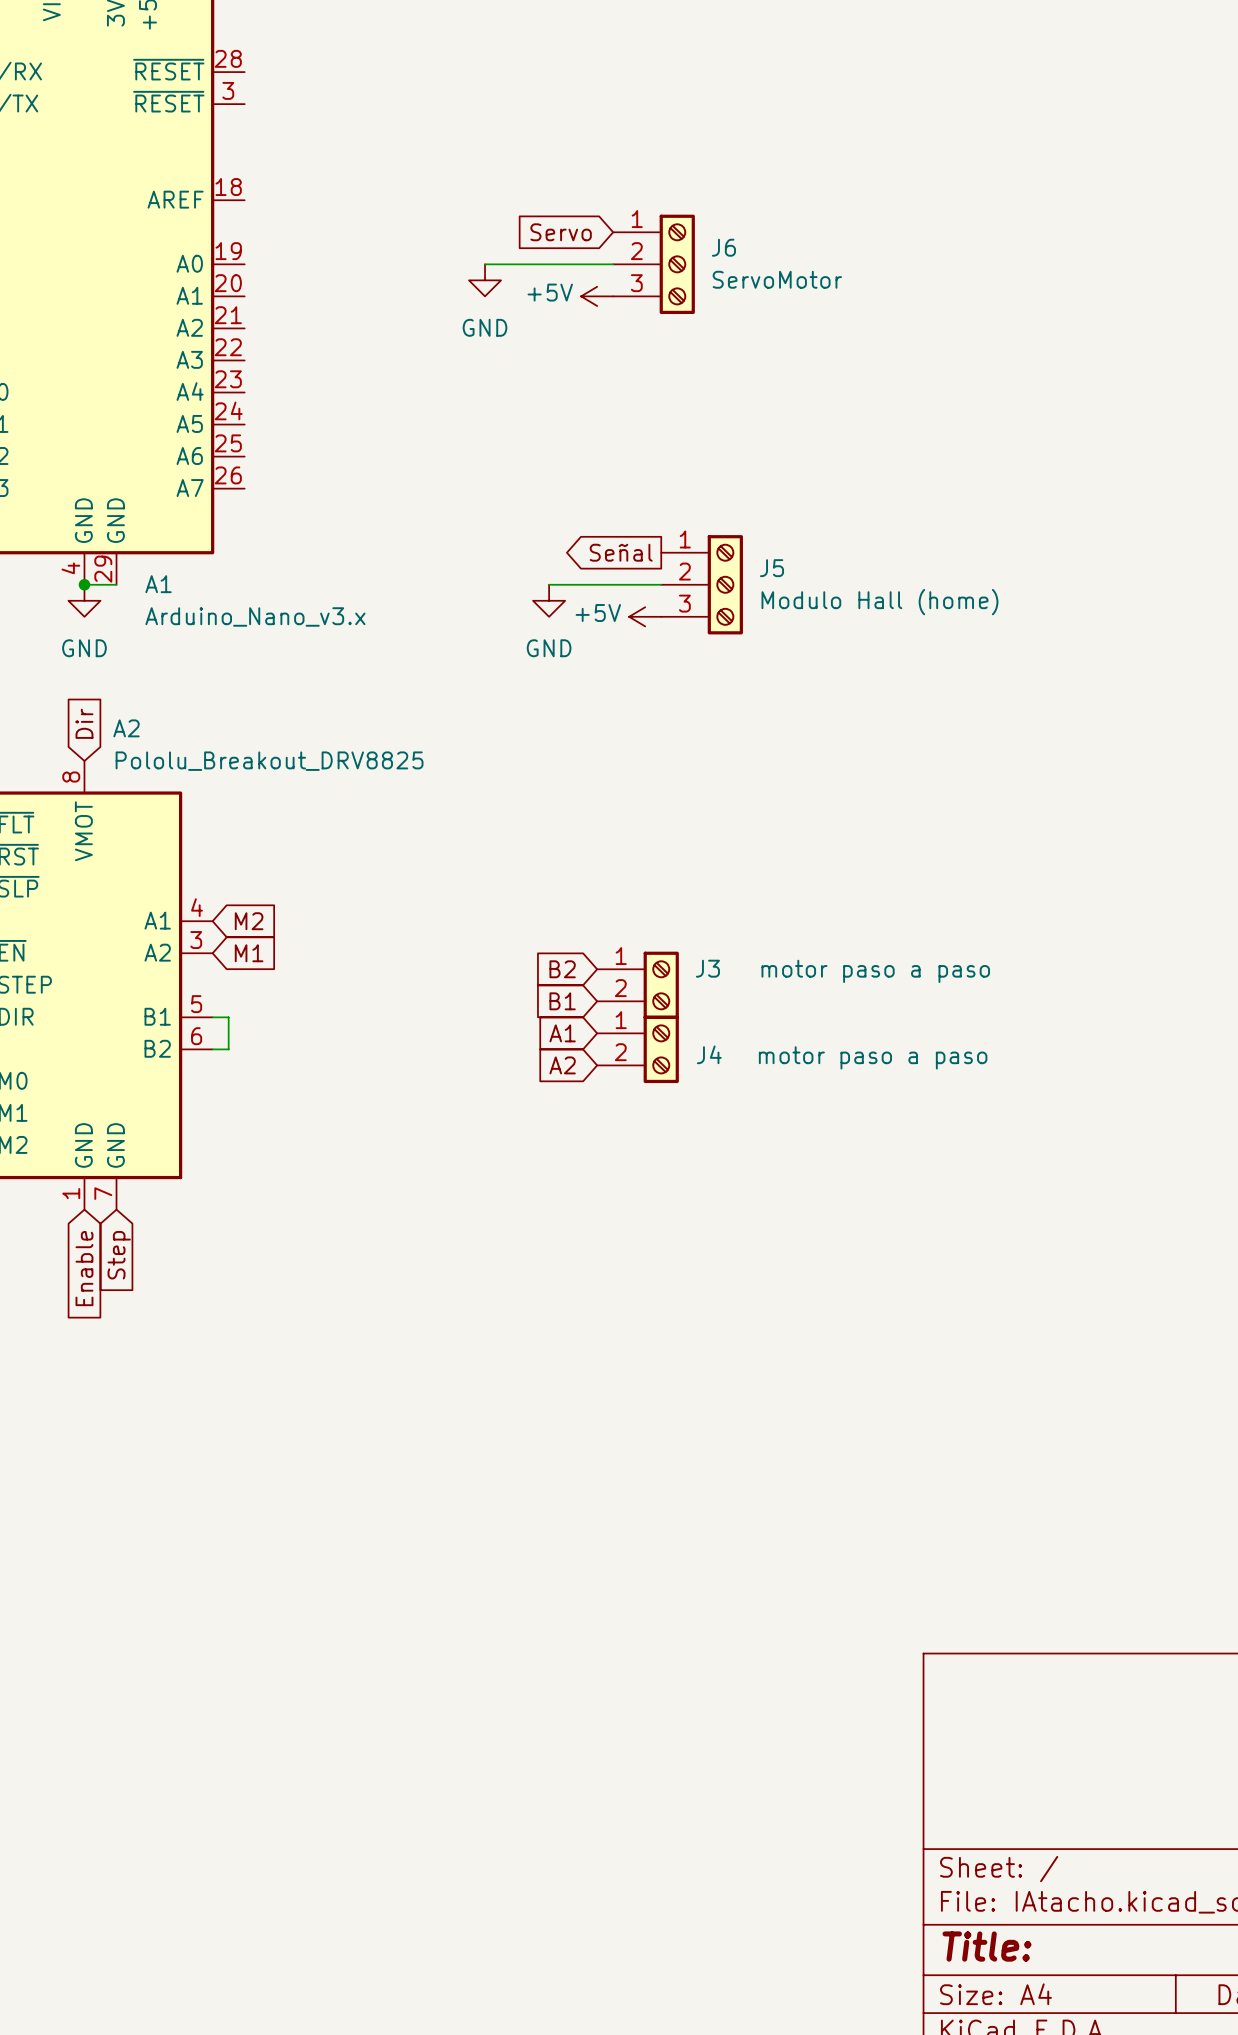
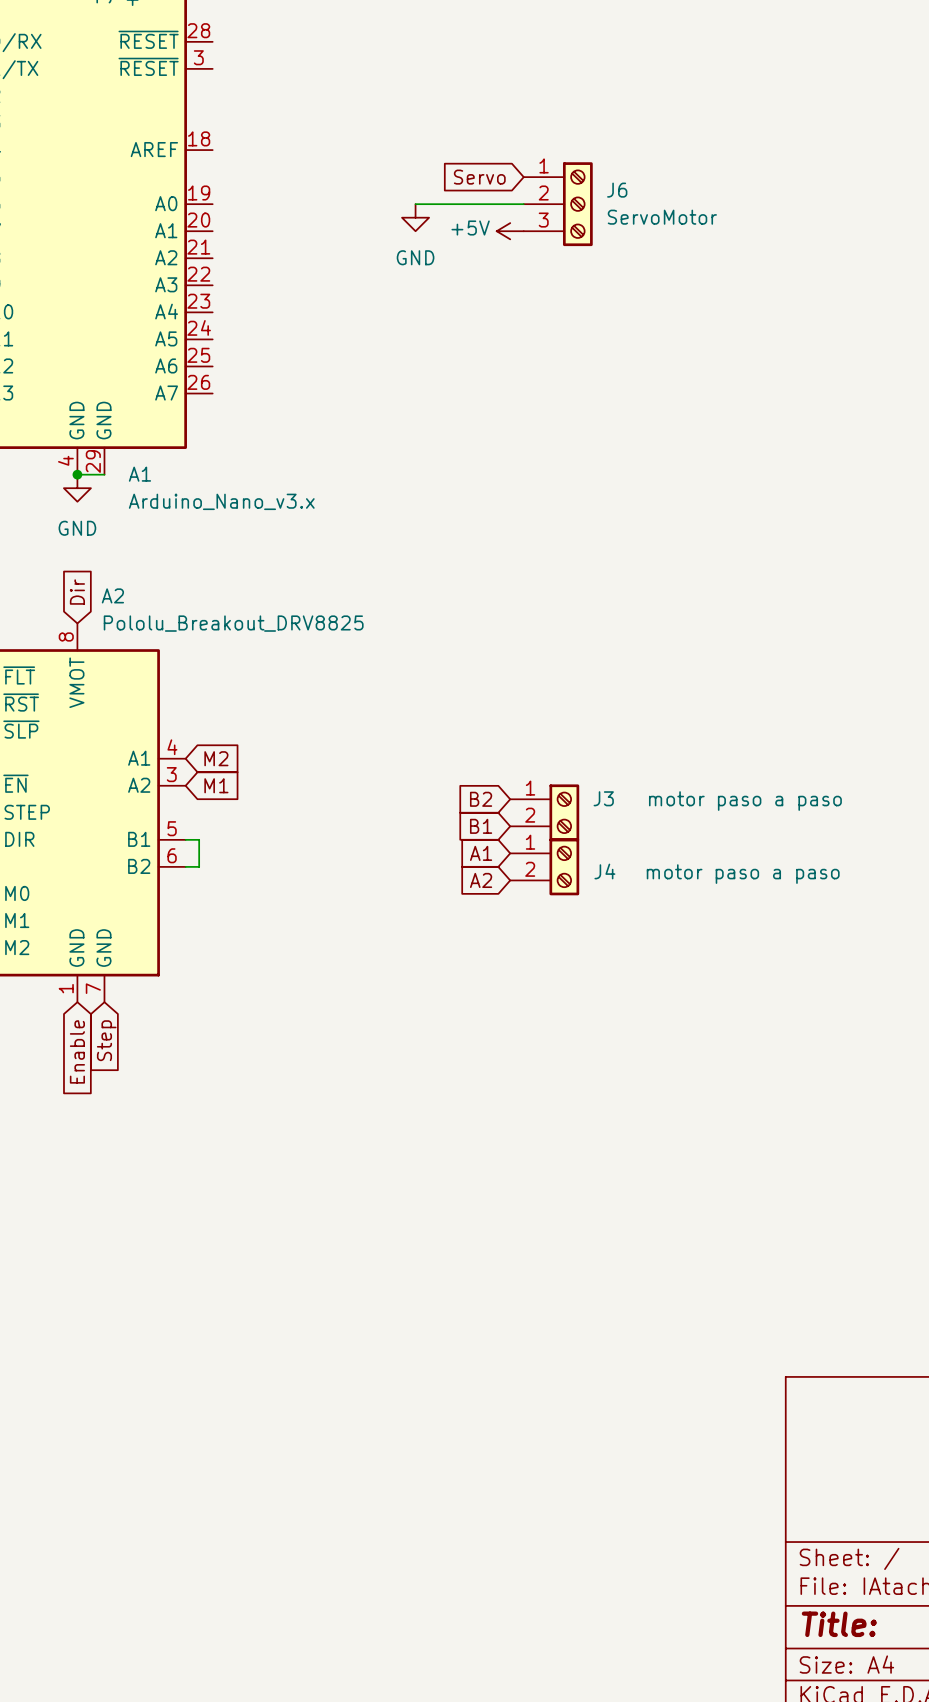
global label: Señal (621, 552) -> none
wire: (549, 584) (661, 584) -> none
J5: Modulo Hall (home) (702, 584) -> none
power symbol: GND (549, 600) -> none
power symbol: +5V (645, 616) -> none

